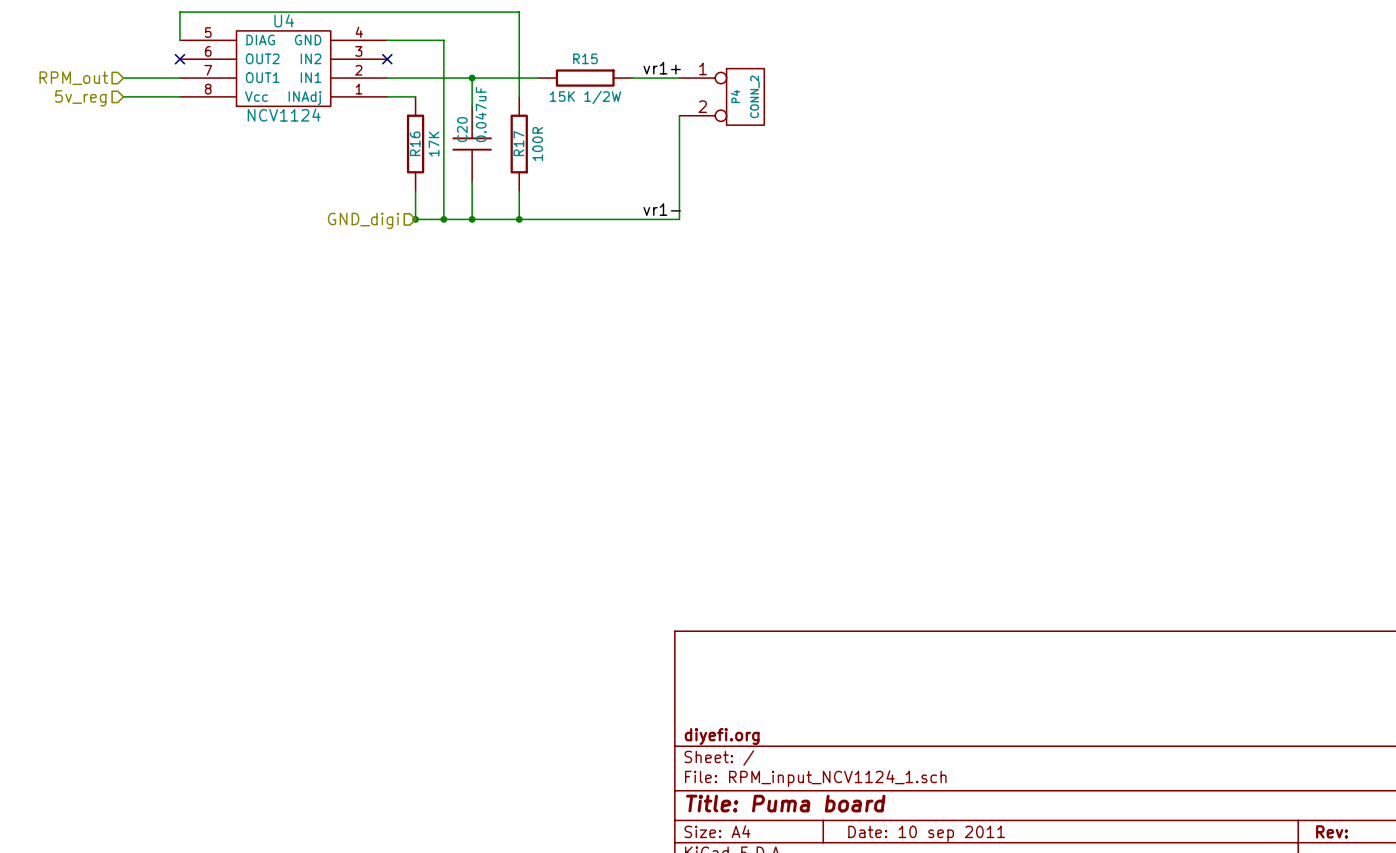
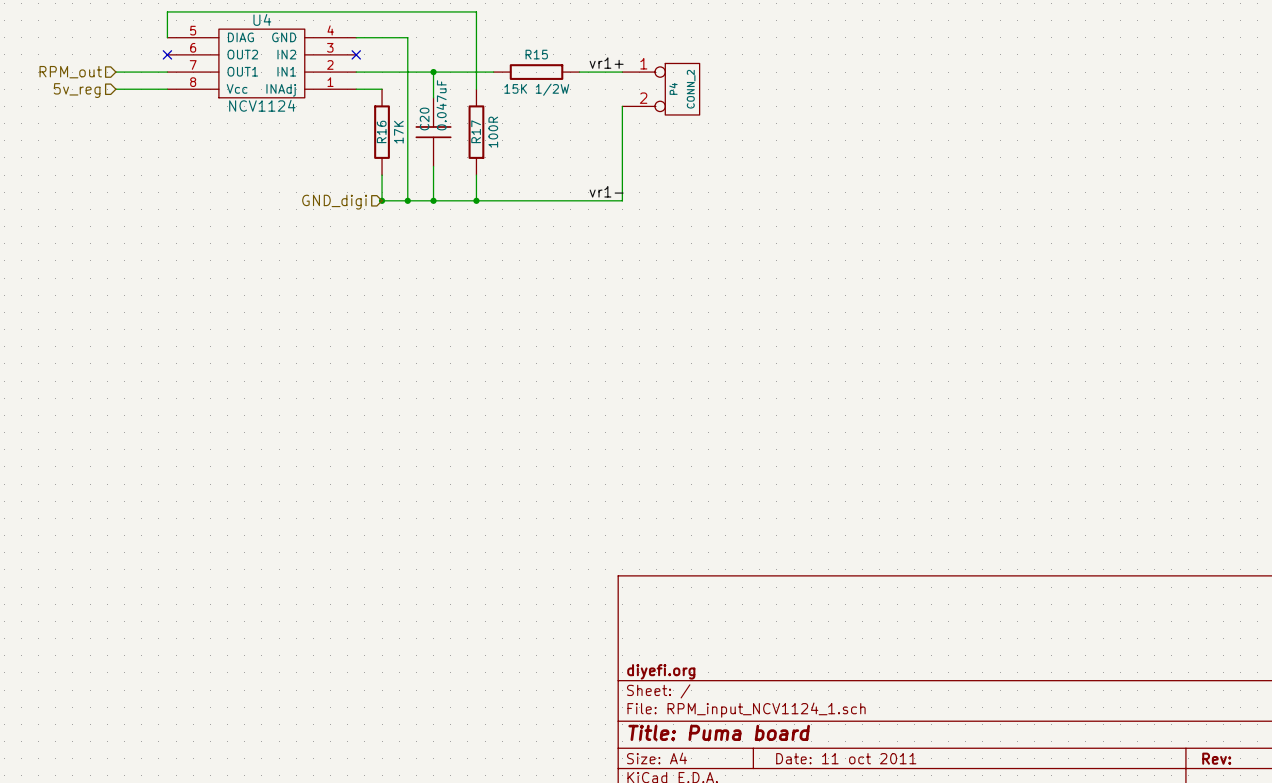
title block: Date: 10 sep 2011 (926, 833) -> Date: 11 oct 2011 (846, 758)

